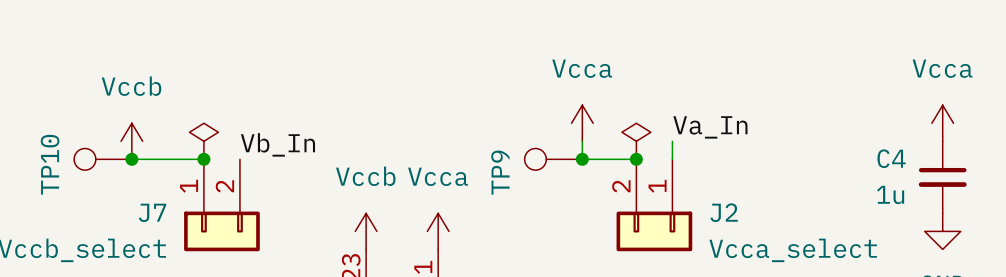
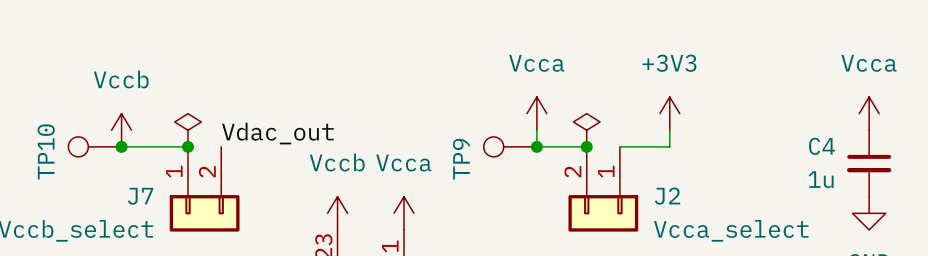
power symbol: none -> +3V3 (669, 113)
label: Va_In (710, 127) -> none
wire: (672, 141) (672, 159) -> (669, 130) (669, 146) (619, 146)
label: Vb_In (277, 144) -> Vdac_out (277, 133)

